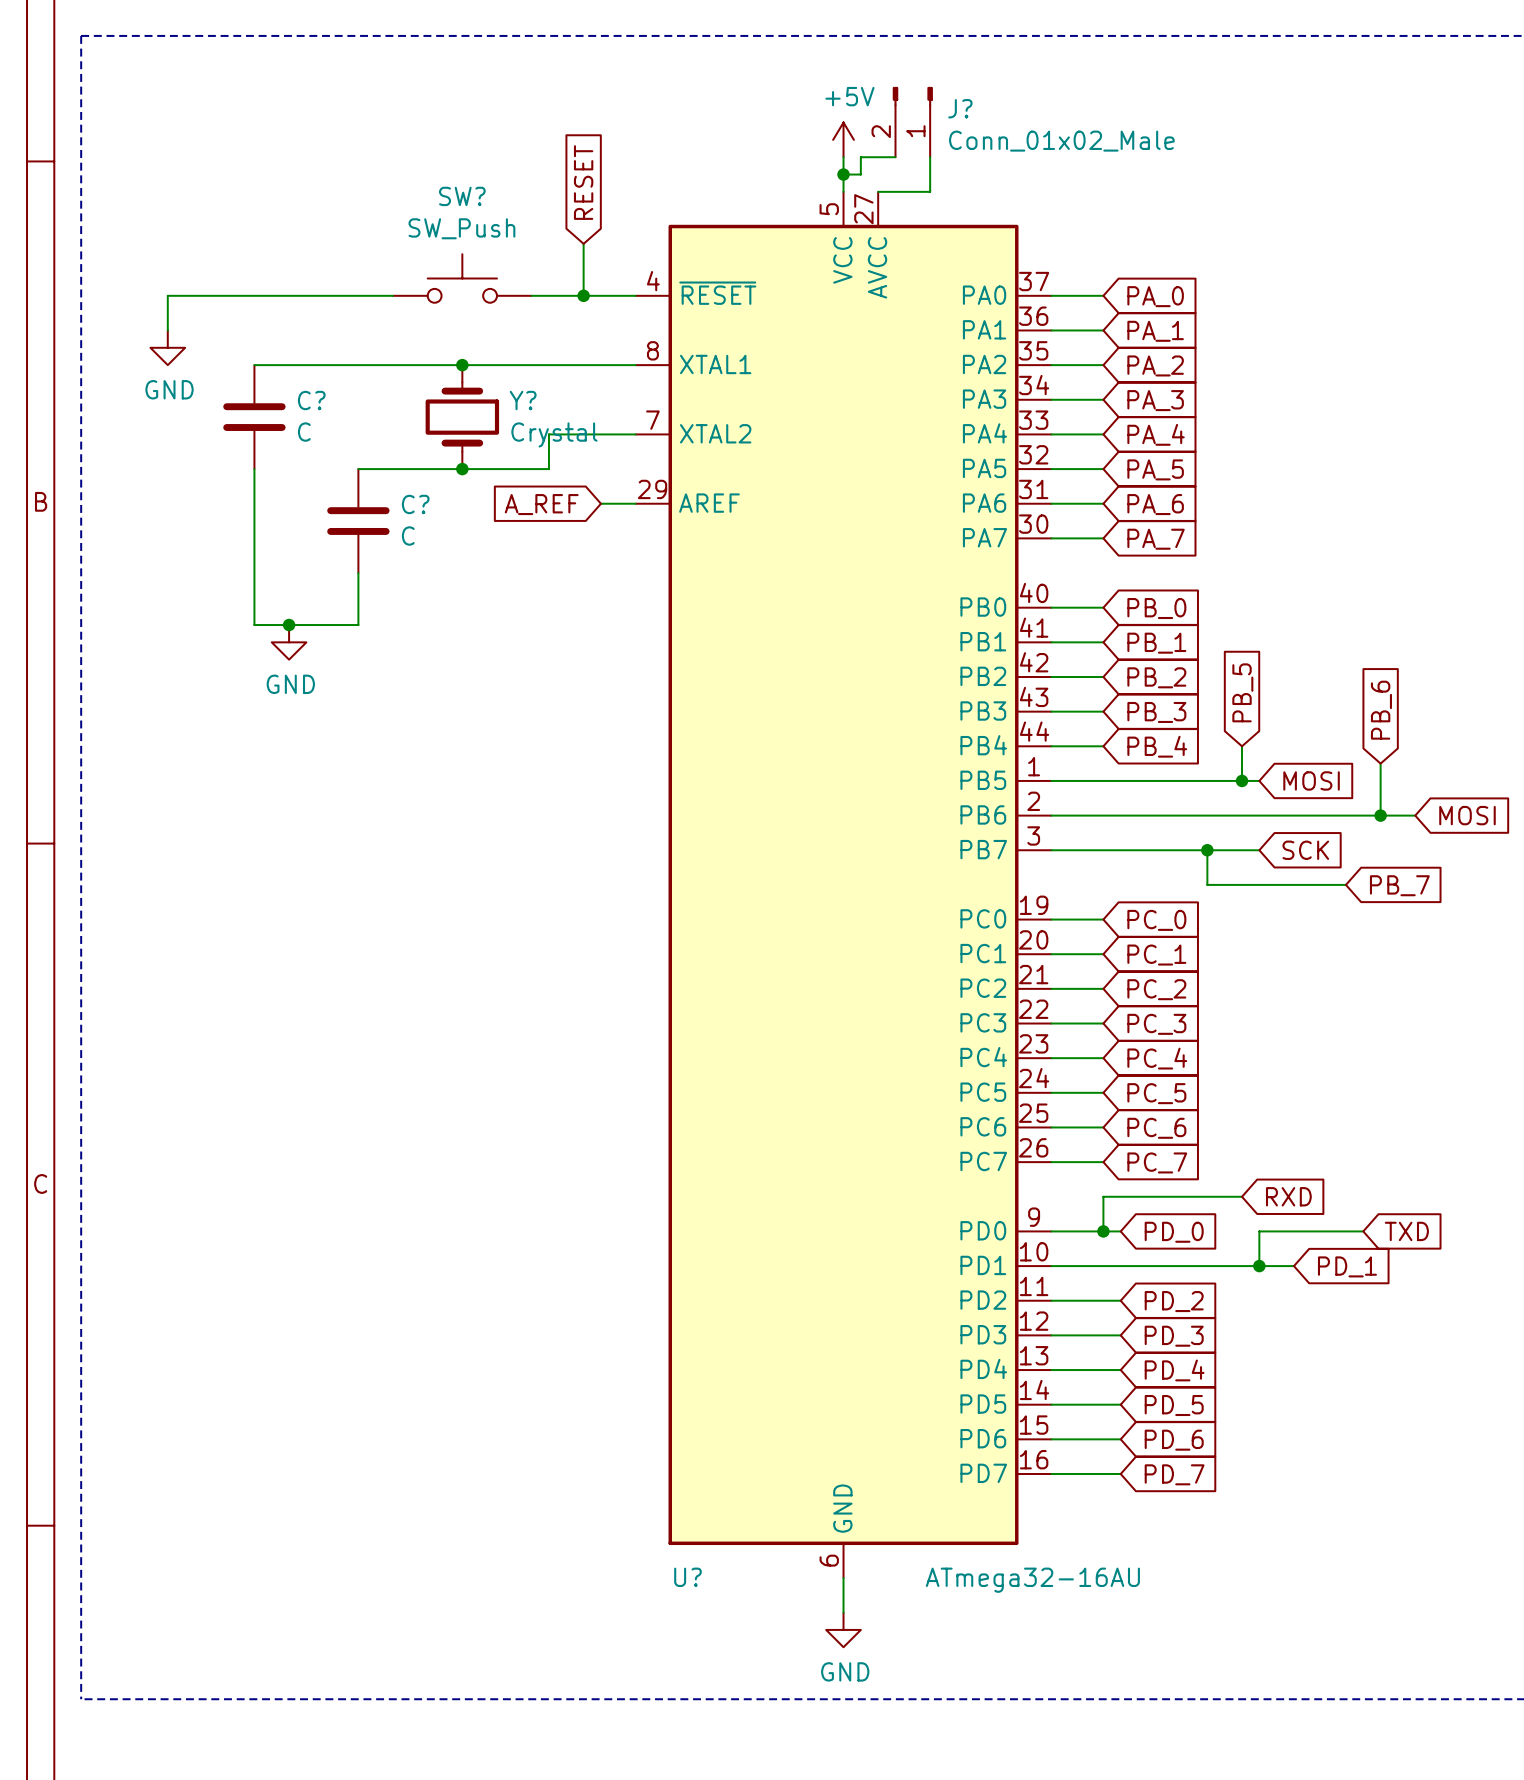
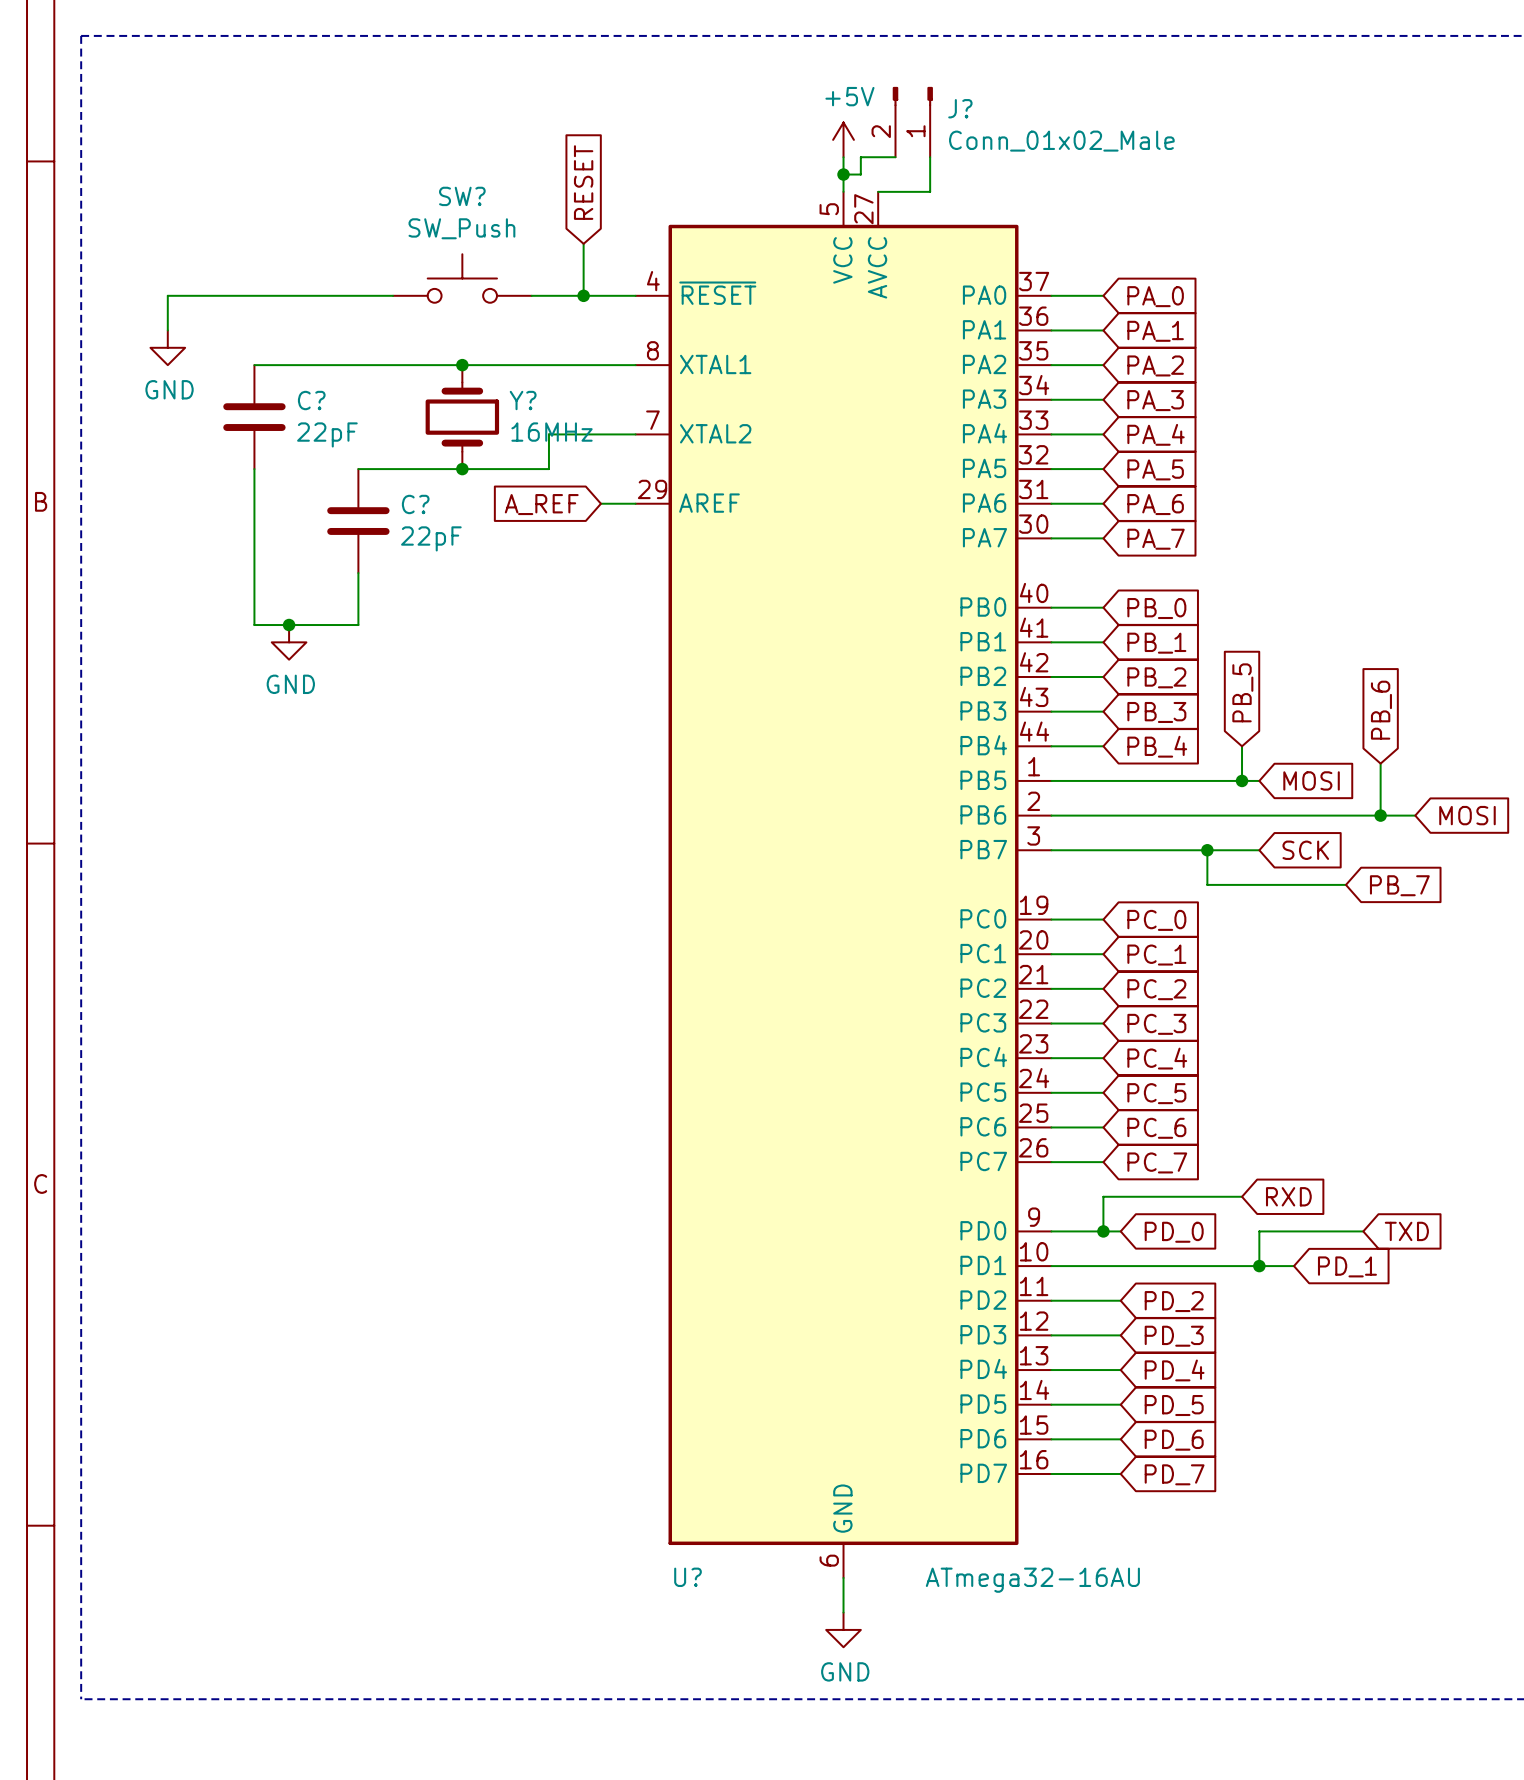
C? value: C (304, 432) -> 22pF (327, 434)
Y? value: Crystal (554, 434) -> 16MHz (552, 432)
C? value: C (408, 536) -> 22pF (431, 538)

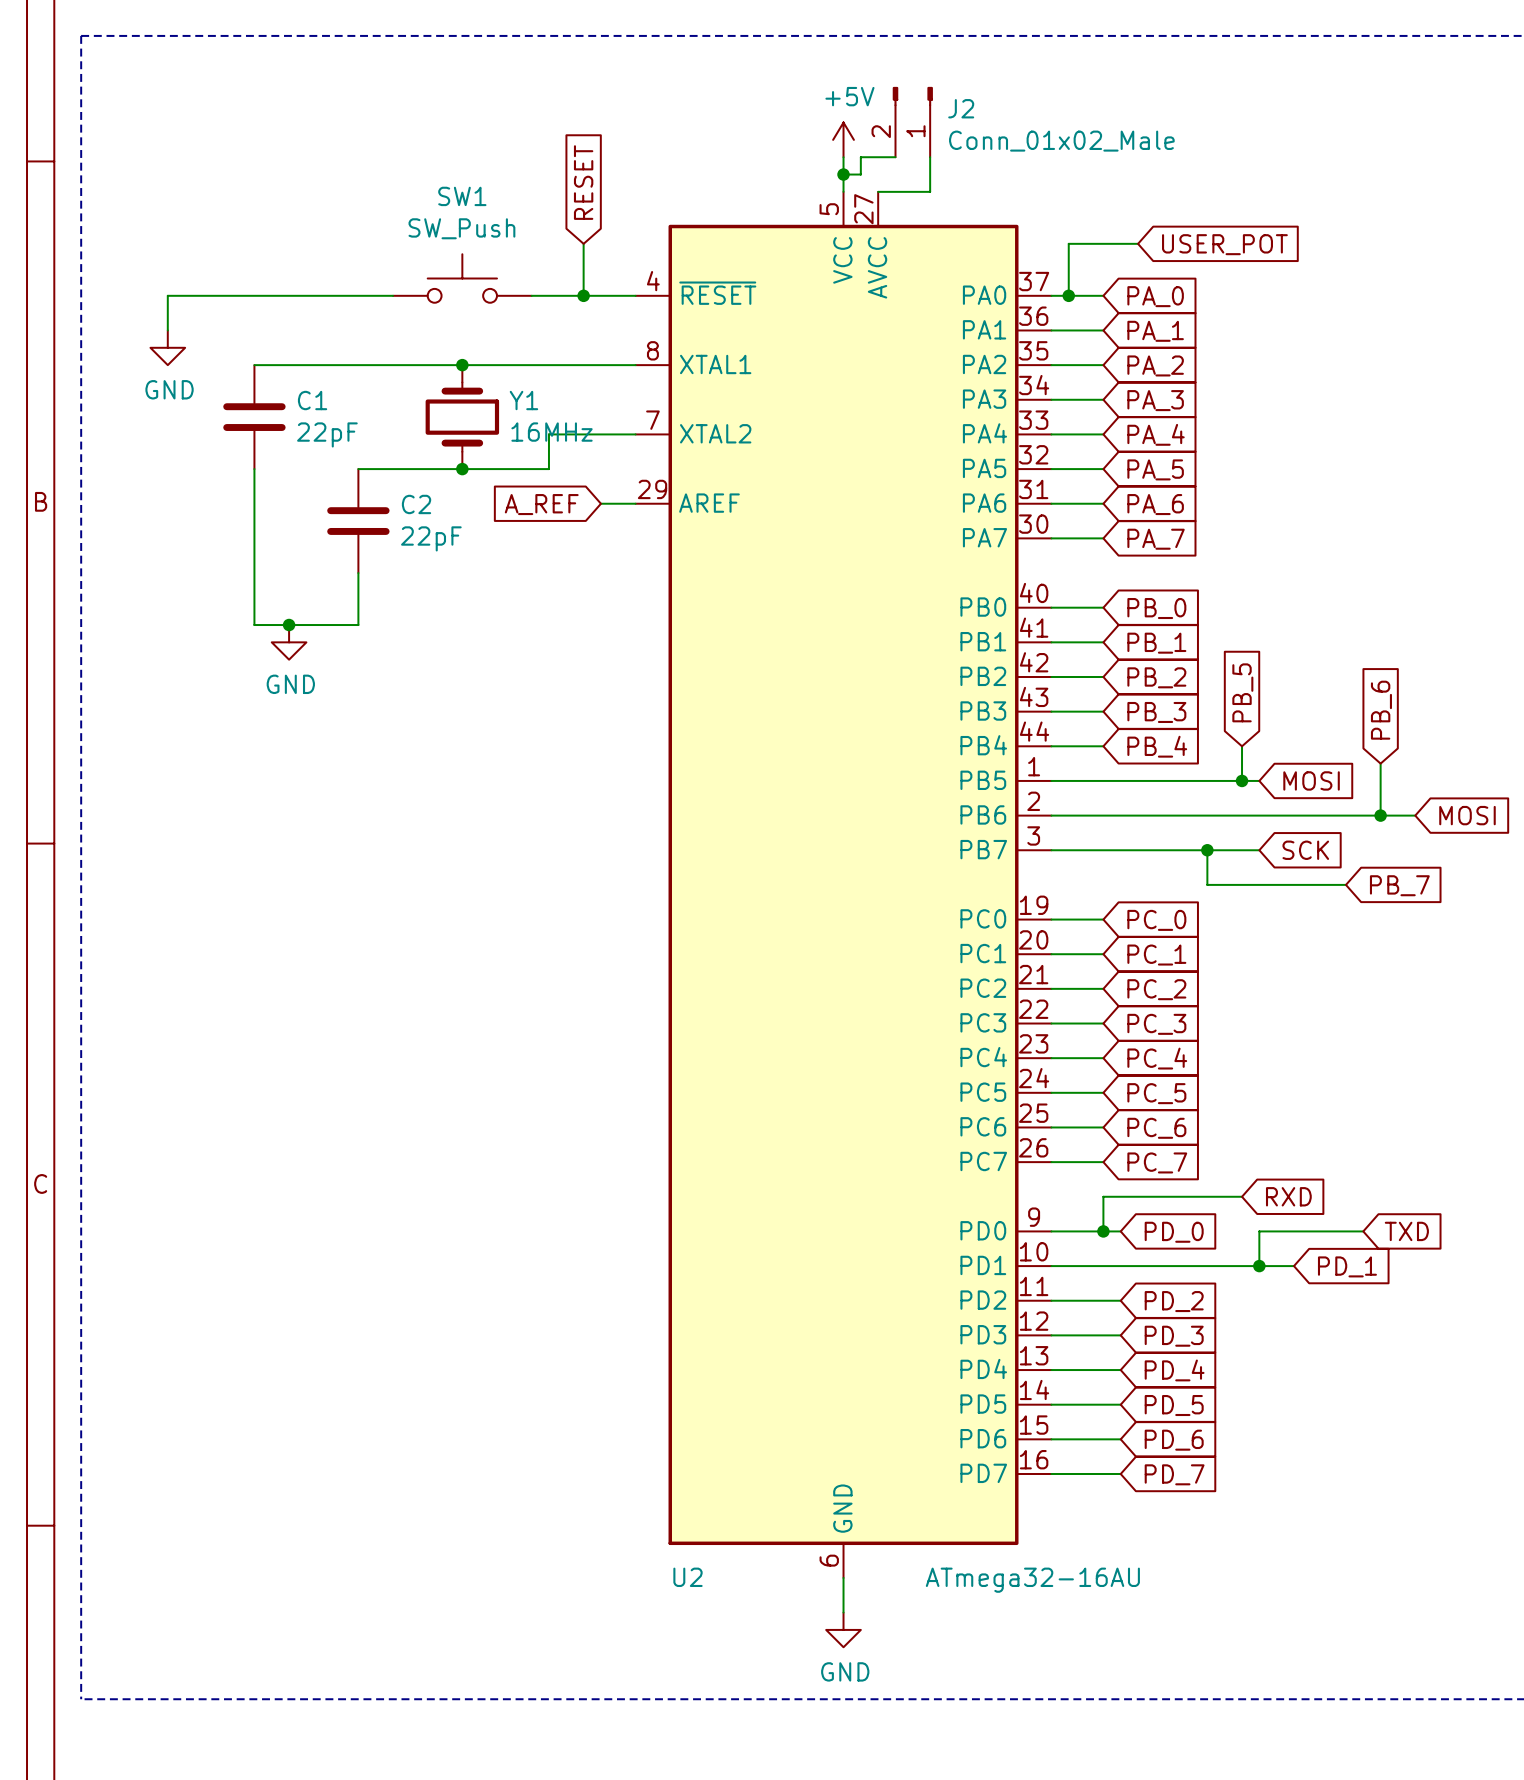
J? name: J? (960, 108) -> J2 (961, 108)
SW? name: SW? (462, 196) -> SW1 (462, 196)
wire: none -> (1138, 243) (1068, 243) (1068, 295)
global label: none -> USER_POT (1224, 244)
junction: none -> (1068, 295)
C? name: C? (311, 400) -> C1 (312, 400)
Y? name: Y? (523, 400) -> Y1 (523, 400)
C? name: C? (415, 504) -> C2 (416, 504)
U? name: U? (688, 1577) -> U2 (688, 1577)

